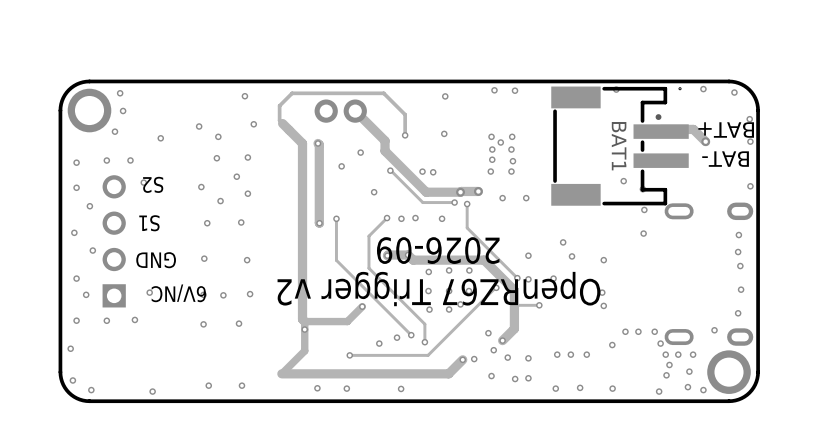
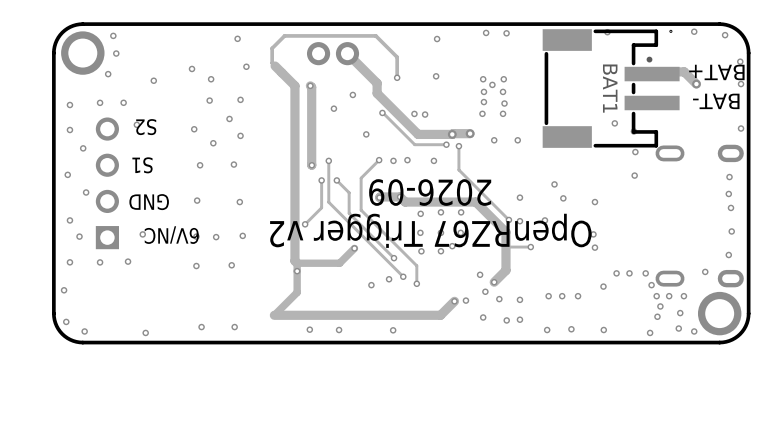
track: none -> (321, 180) (321, 207) (305, 224)
via: none -> (321, 180)
track: none -> (336, 180) (349, 192) (349, 213) (394, 258)
via: none -> (336, 180)
via: none -> (305, 224)
track: (496, 287) (428, 355) (349, 355) -> none
via: (496, 287) -> none
via: none -> (394, 258)
via: (349, 355) -> none

